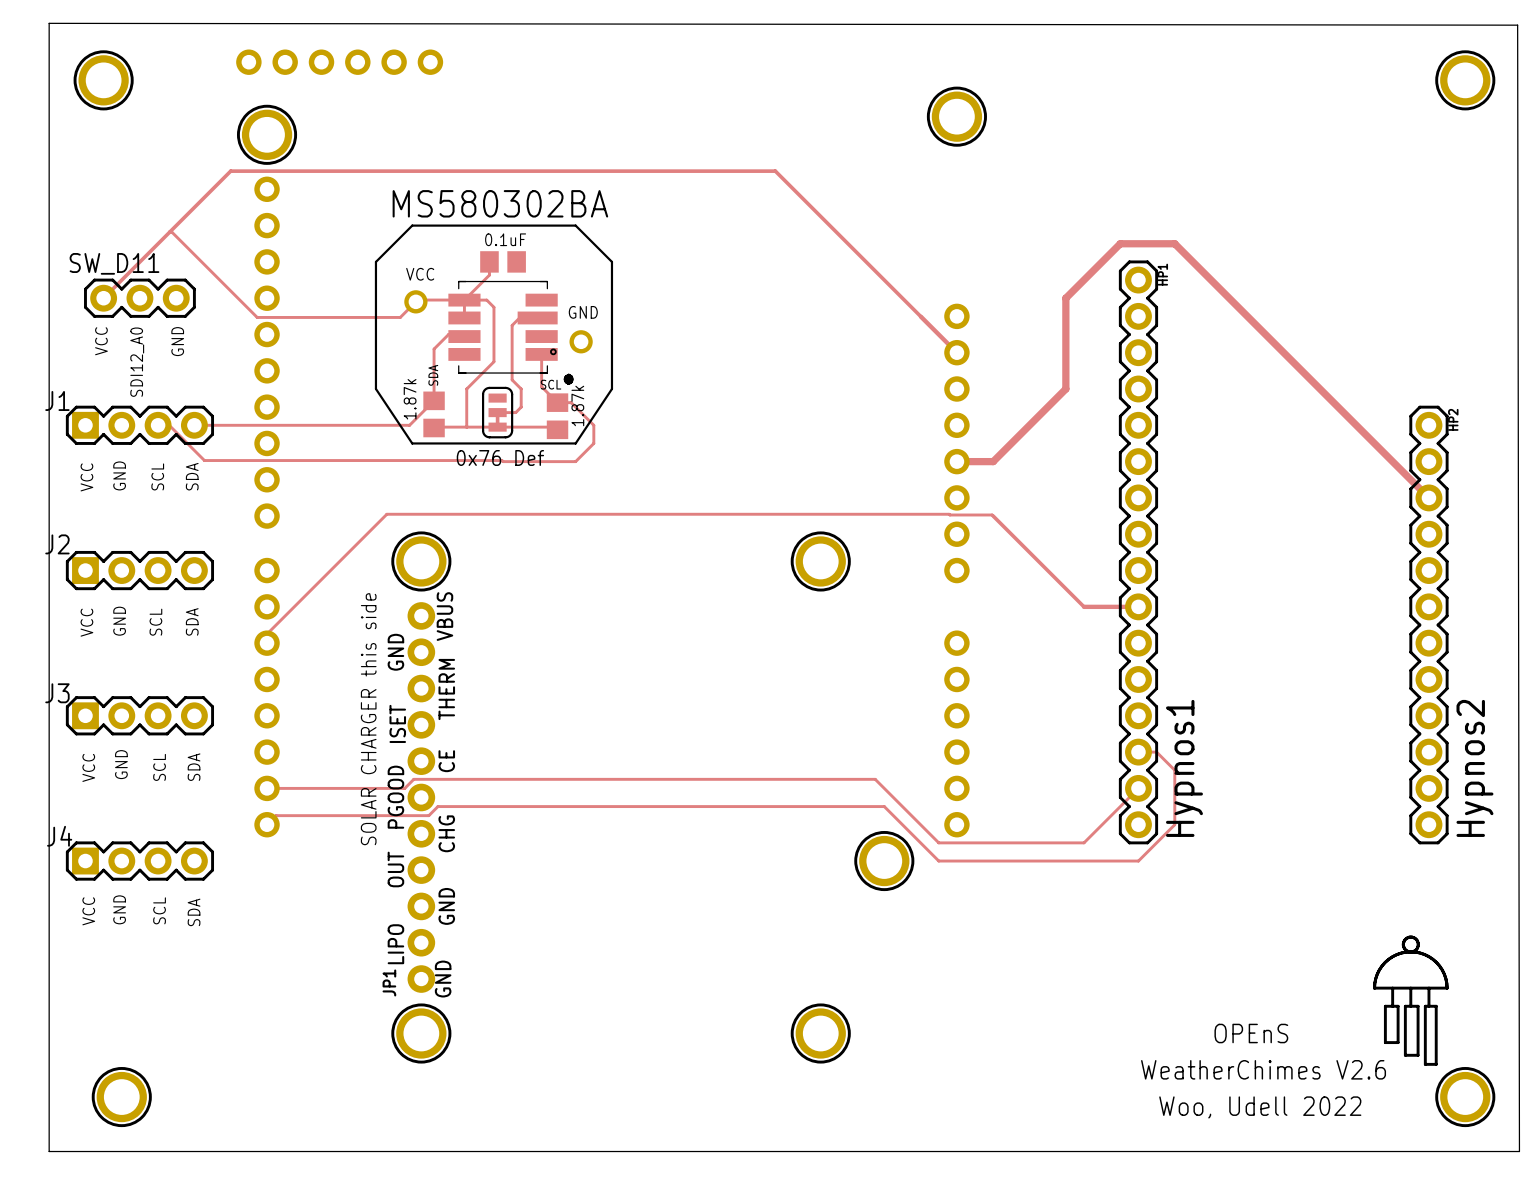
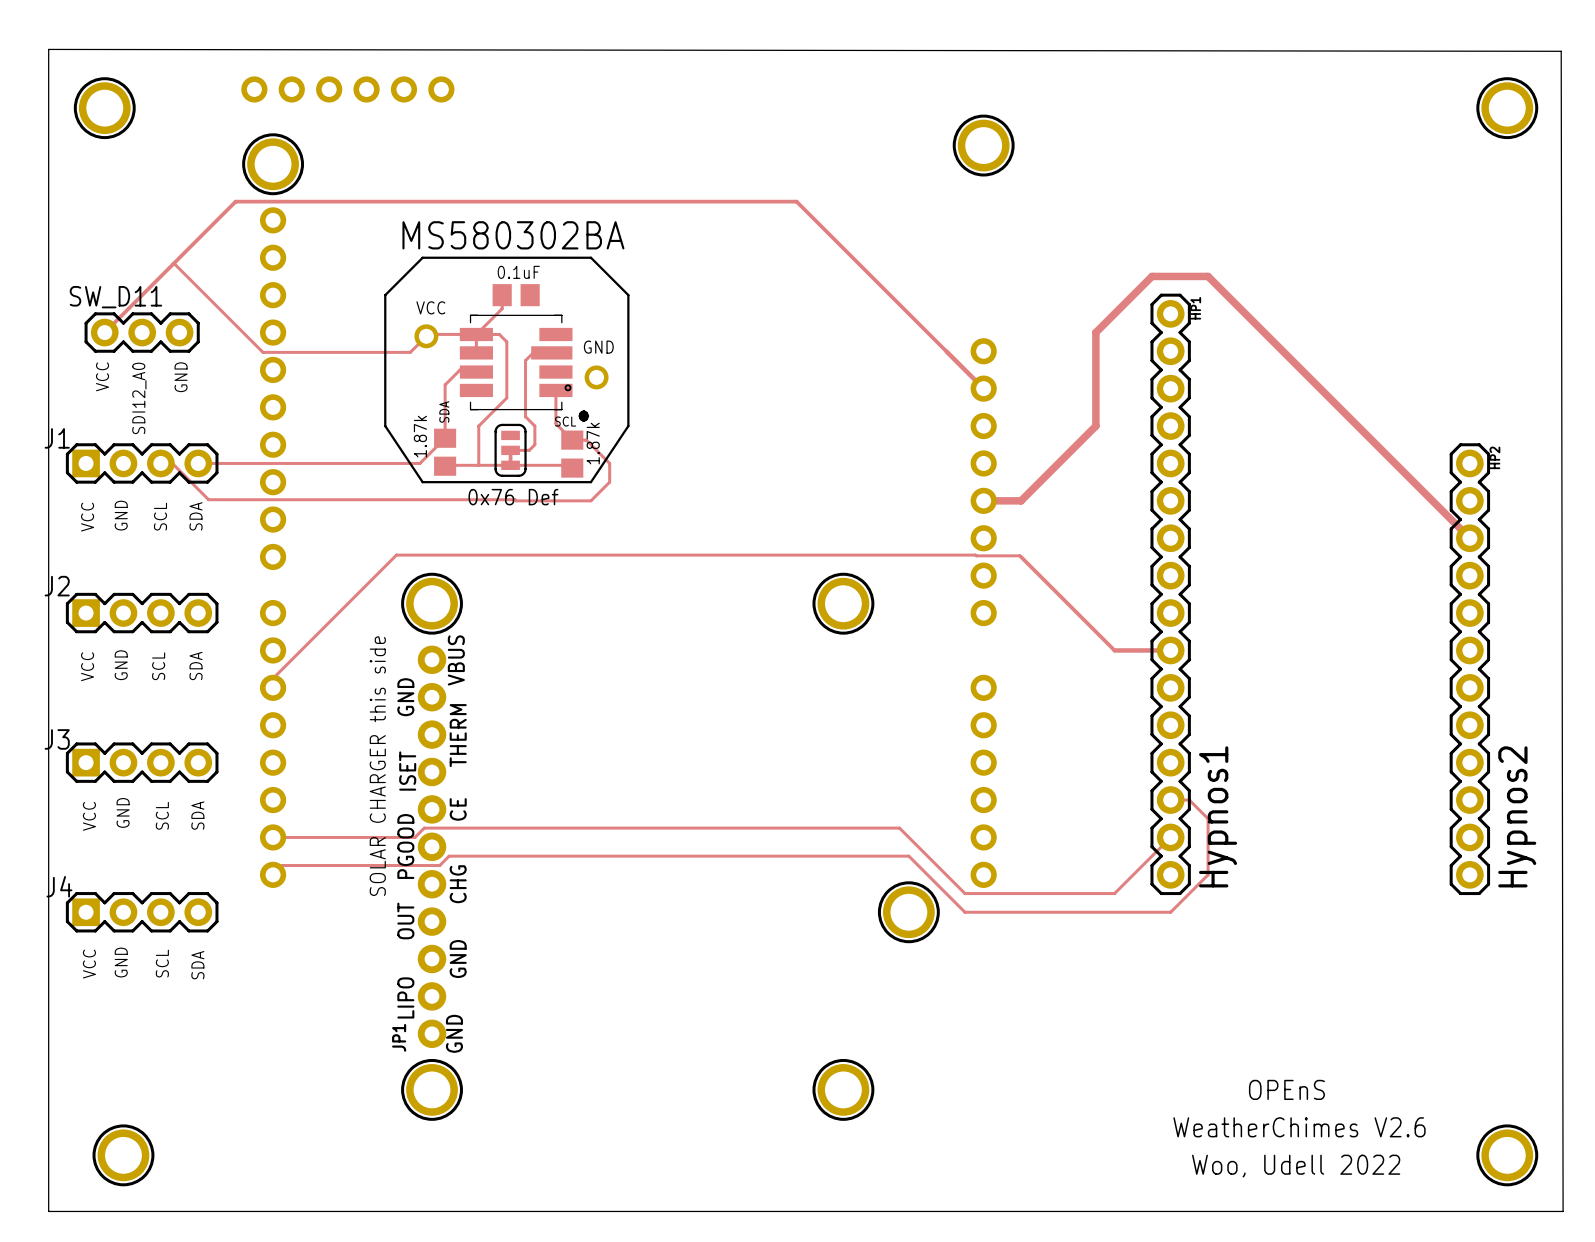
drawing: [1401, 935, 1420, 954] -> none
line: (1374, 988) (1447, 988) -> none
line: (1374, 988) (1377, 974) (1385, 962) (1396, 954) (1410, 951) (1424, 954) (1436, 962) (1444, 974) (1447, 988) -> none
line: (1374, 988) (1377, 974) (1385, 962) (1396, 954) (1410, 951) (1424, 954) (1436, 962) (1444, 974) (1447, 988) -> none
line: (1392, 988) (1392, 1006) -> none
line: (1410, 988) (1410, 1006) -> none
line: (1428, 988) (1428, 1006) -> none
line: (1385, 1006) (1398, 1006) (1398, 1042) (1385, 1042) (1385, 1006) -> none
line: (1405, 1006) (1418, 1006) (1418, 1055) (1405, 1055) (1405, 1006) -> none
line: (1425, 1006) (1436, 1006) (1436, 1064) (1425, 1064) (1425, 1006) -> none

